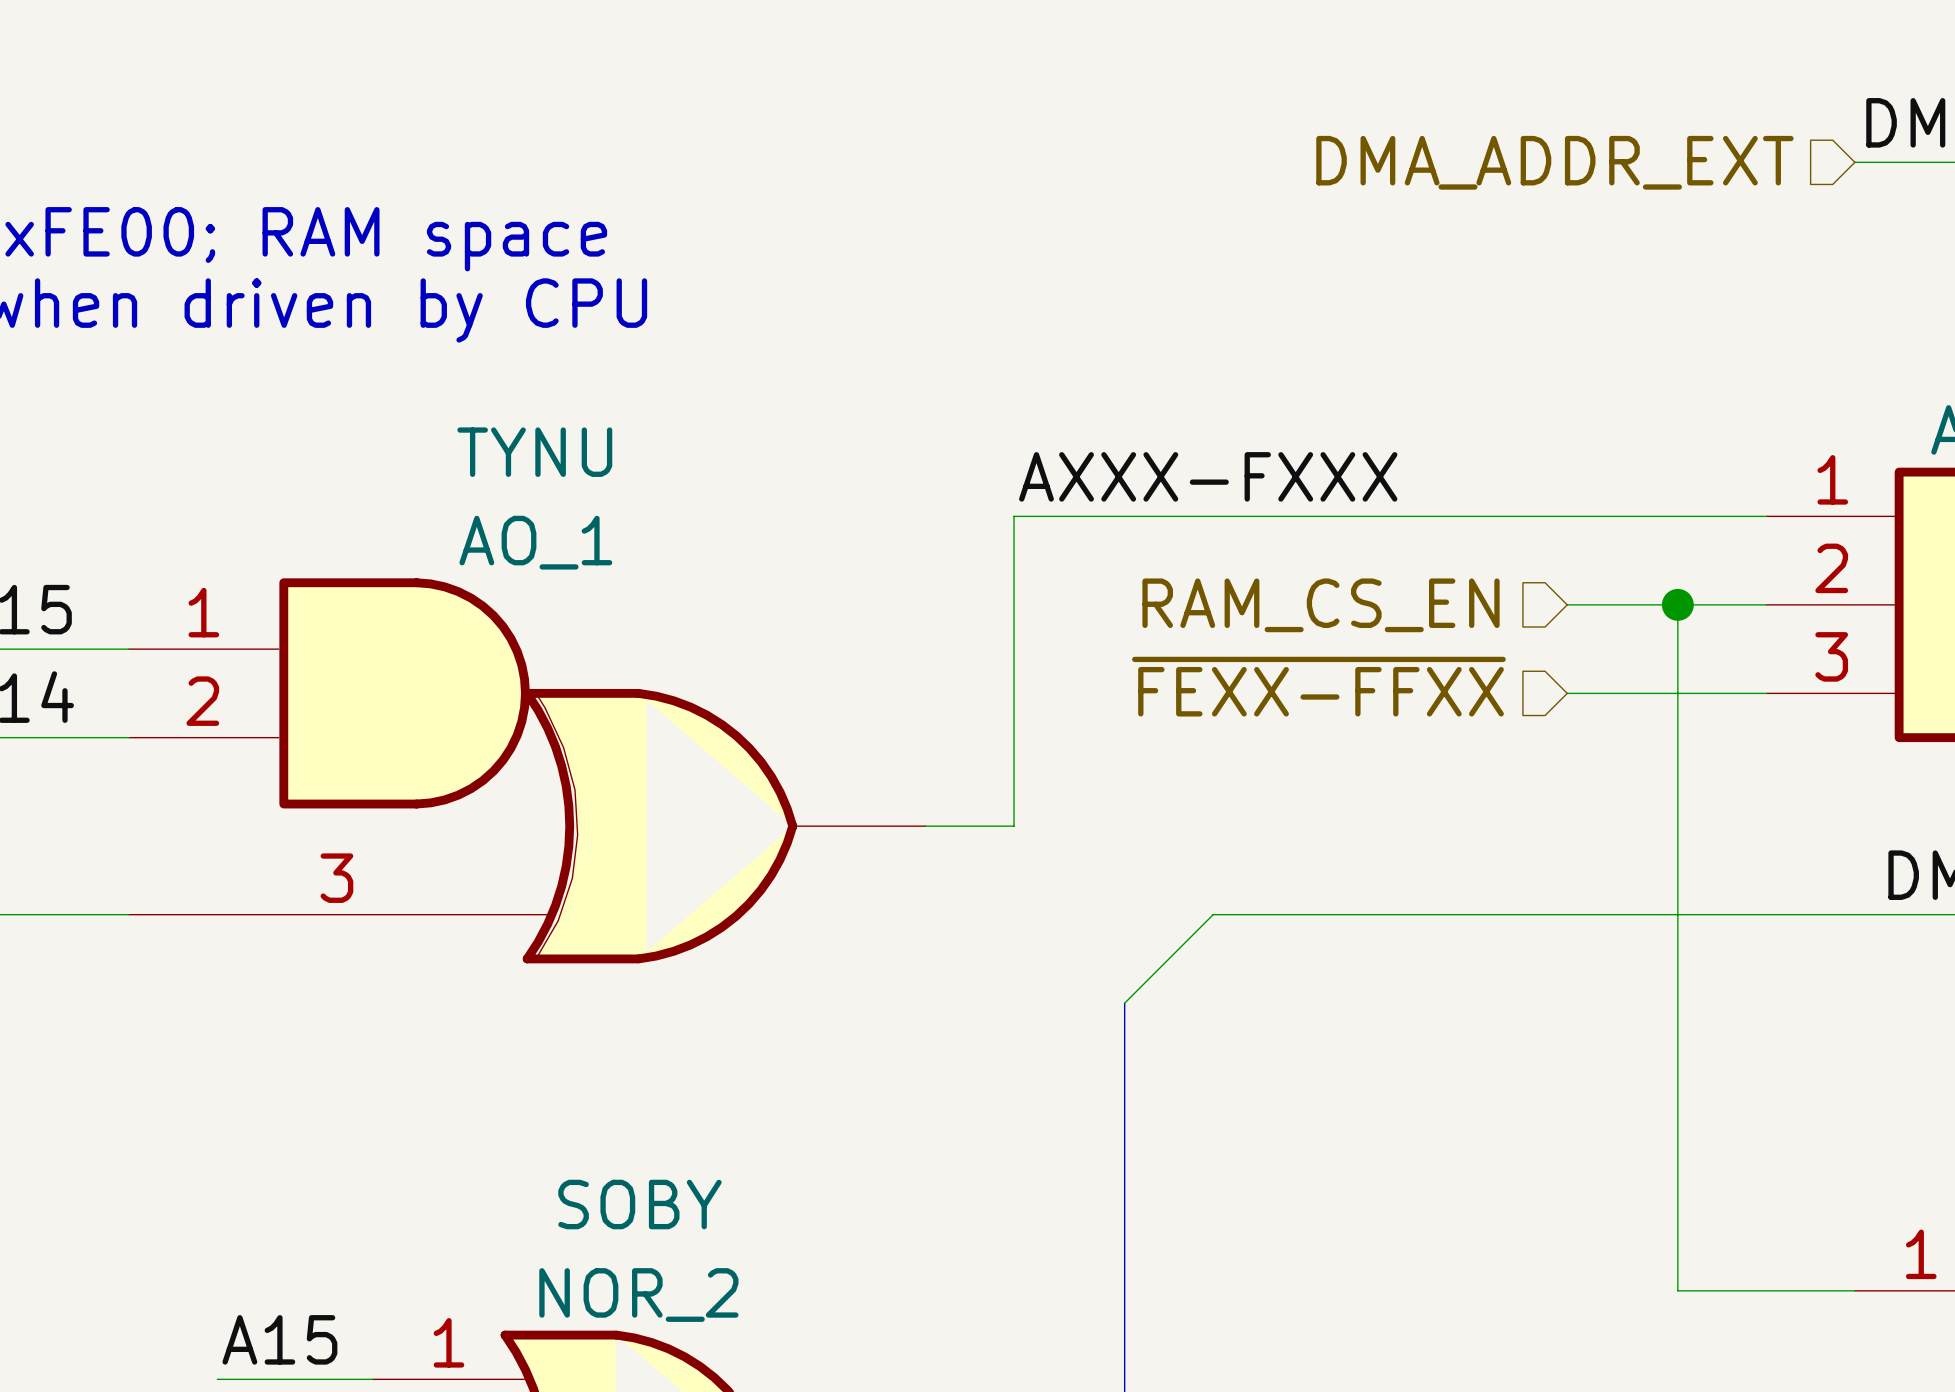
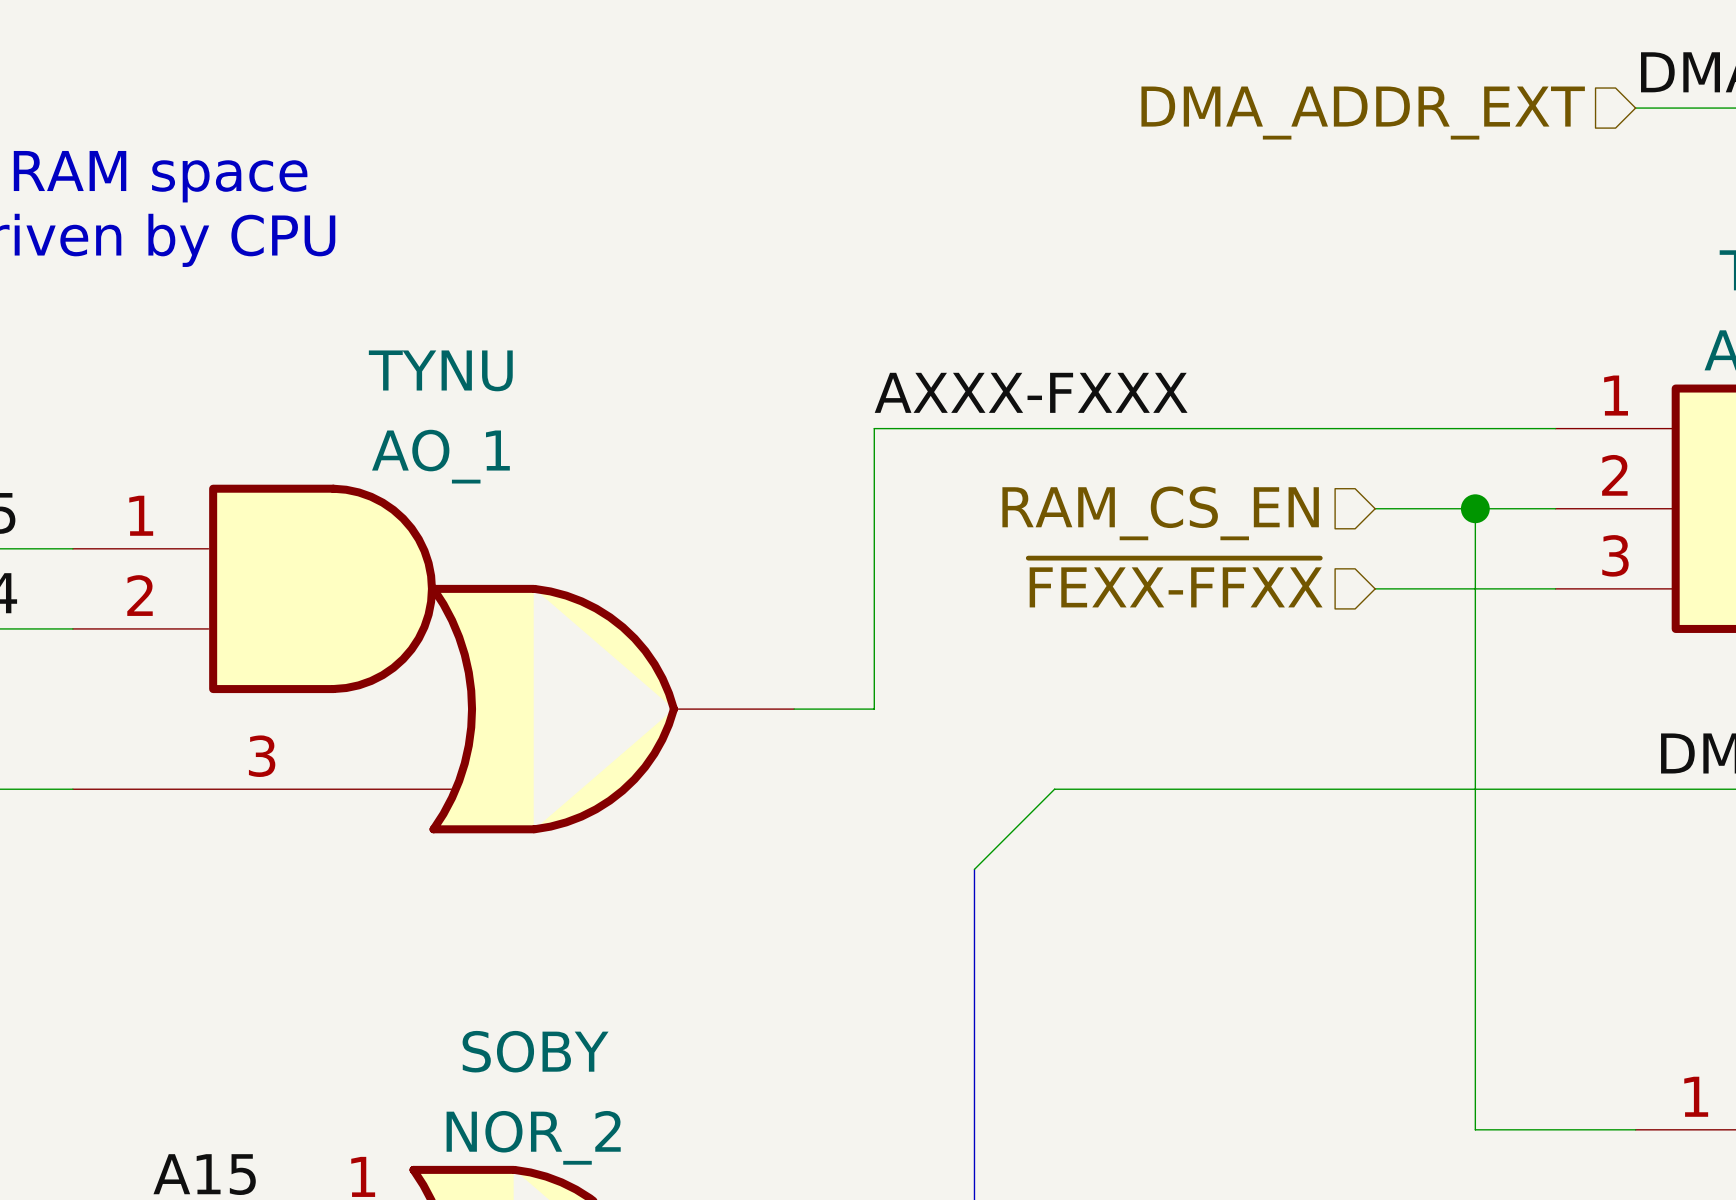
TYNU symbol: [128, 578, 926, 964] -> [72, 484, 795, 834]

